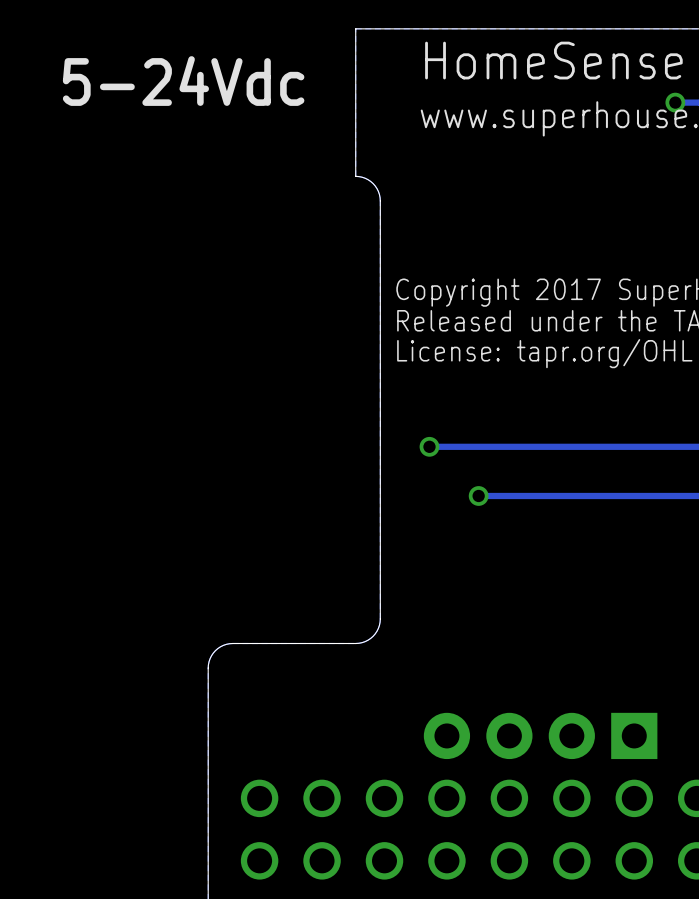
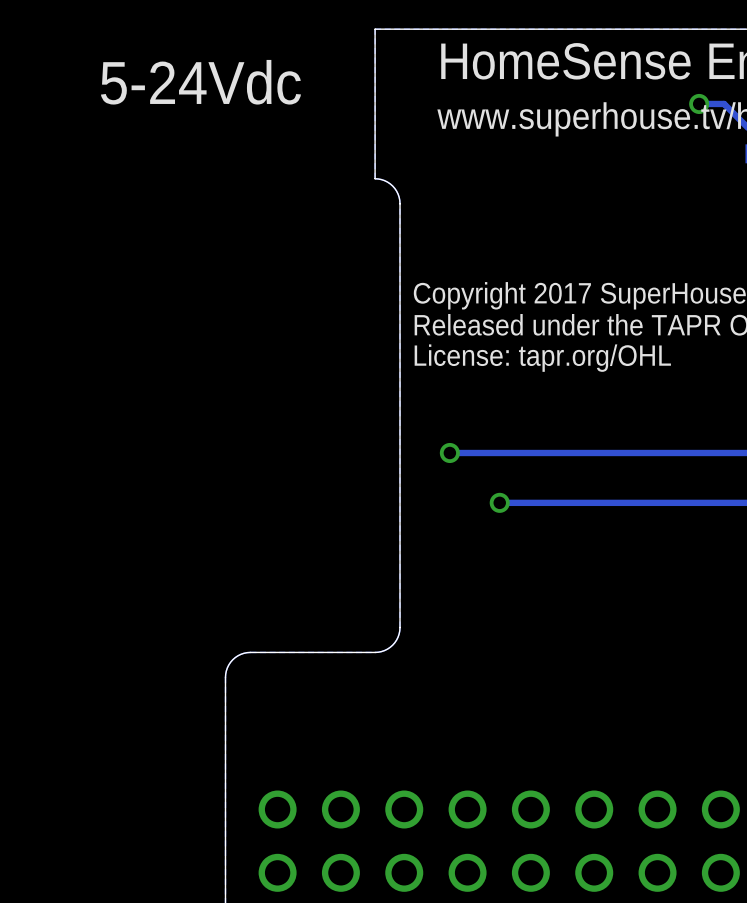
part: (540, 735) -> none

